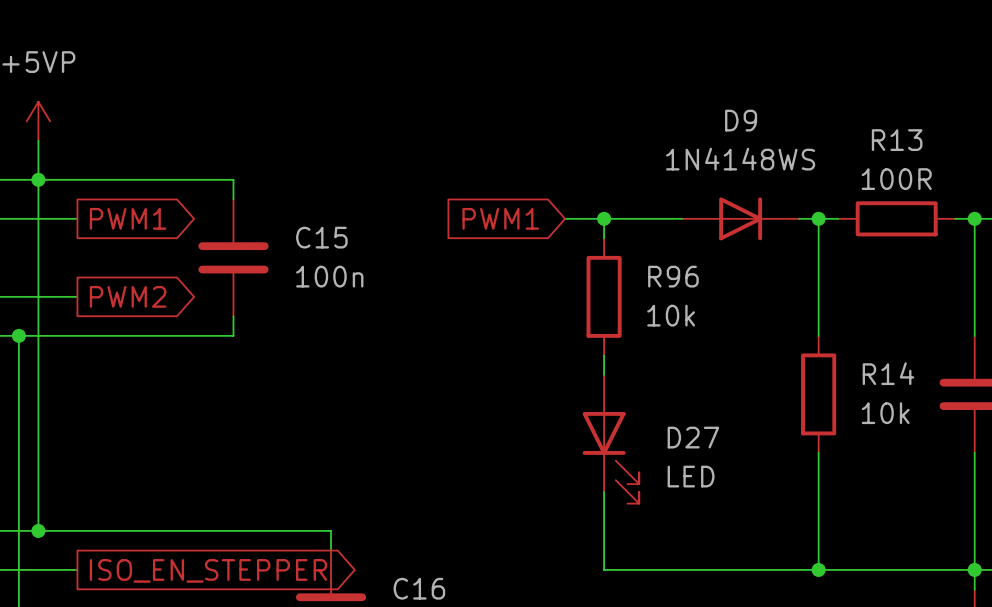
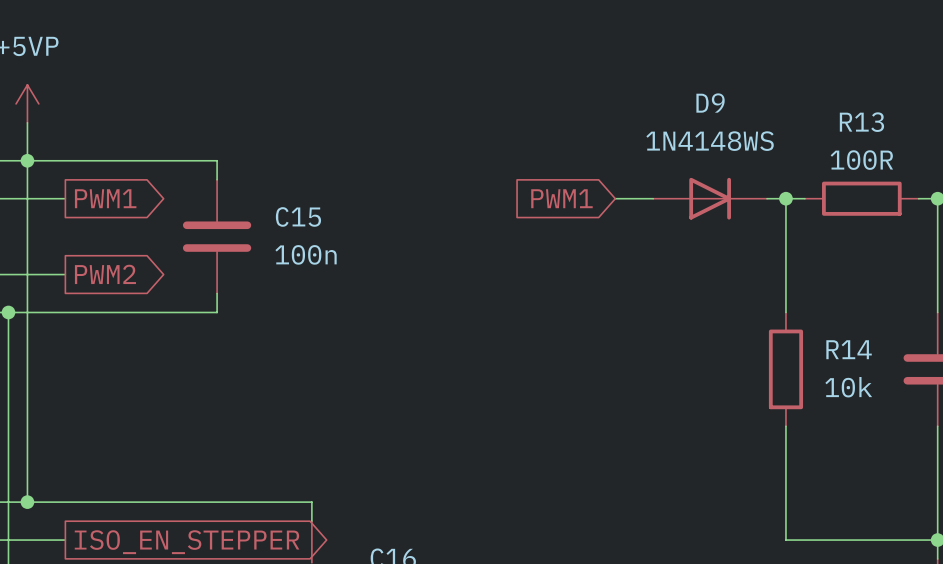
global label position: PWM1 (500, 218) -> PWM1 (561, 198)
wire: (565, 218) (643, 218) -> none
wire: (604, 218) (604, 238) -> none
junction: (604, 218) -> none
R96: 10k (604, 296) -> none
wire: (604, 355) (604, 374) -> none
D27: LED (610, 439) -> none
wire: (604, 491) (604, 569) (818, 569) -> none
junction: (818, 569) -> none

